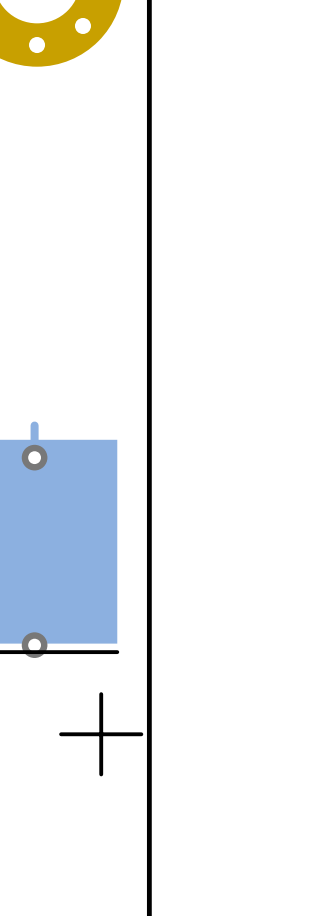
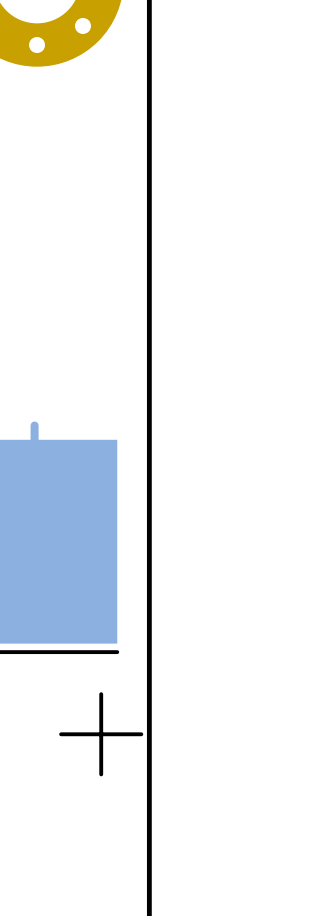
via: (34, 457) -> none
via: (34, 645) -> none

